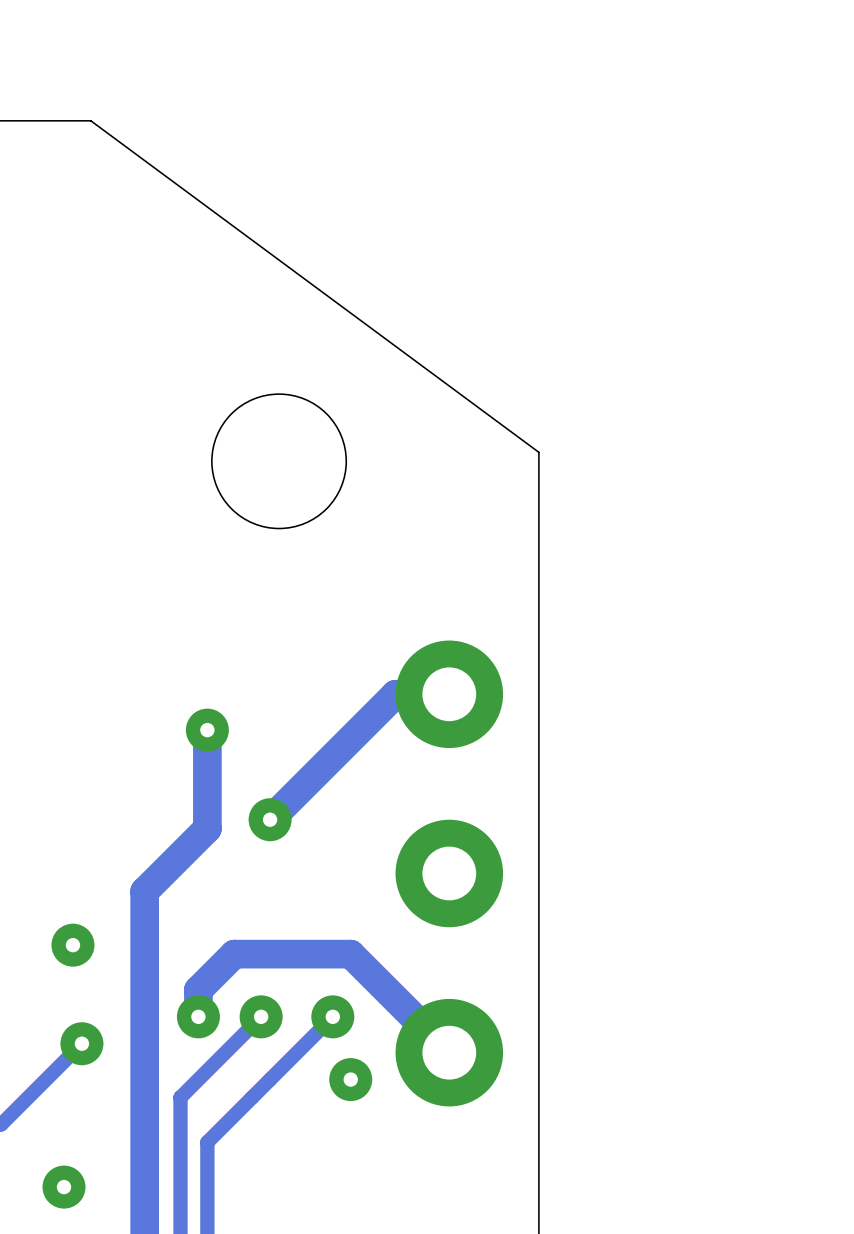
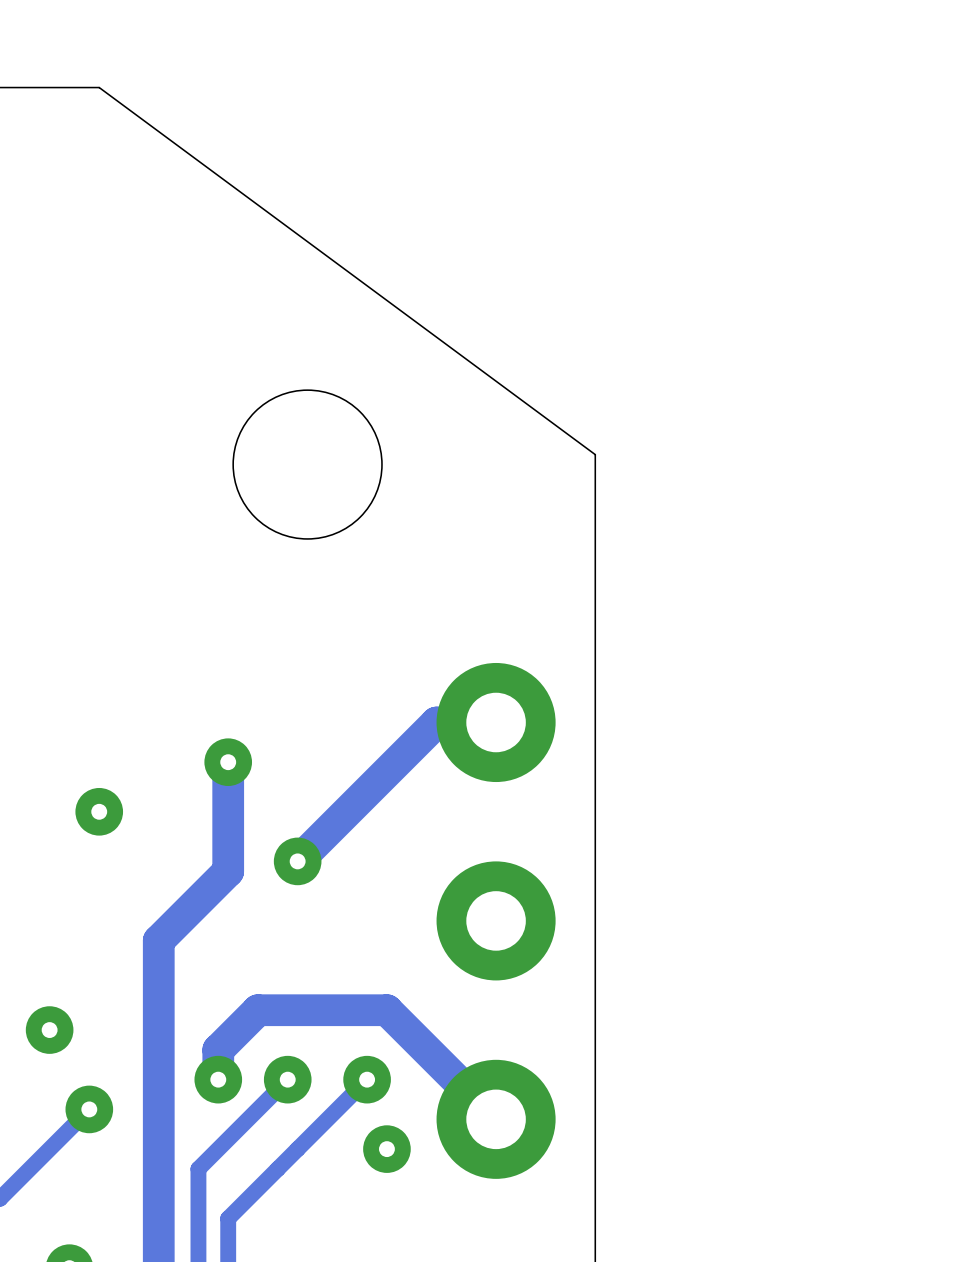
via: none -> (99, 811)
via position: (72, 945) -> (49, 1030)

